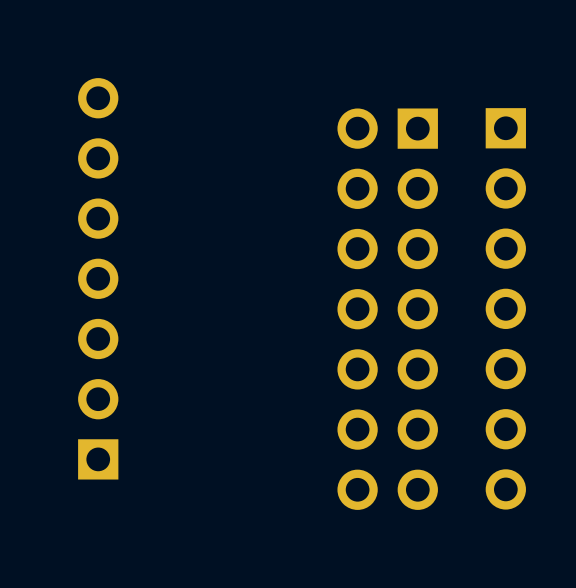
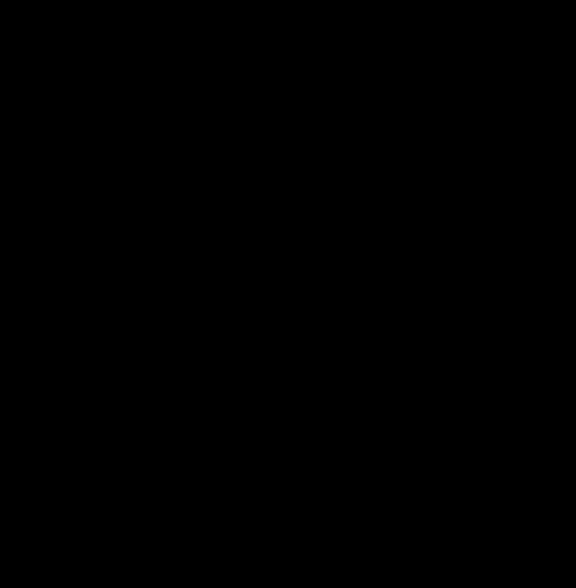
part: (98, 278) -> none
part: (505, 308) -> none
part: (387, 309) -> none

